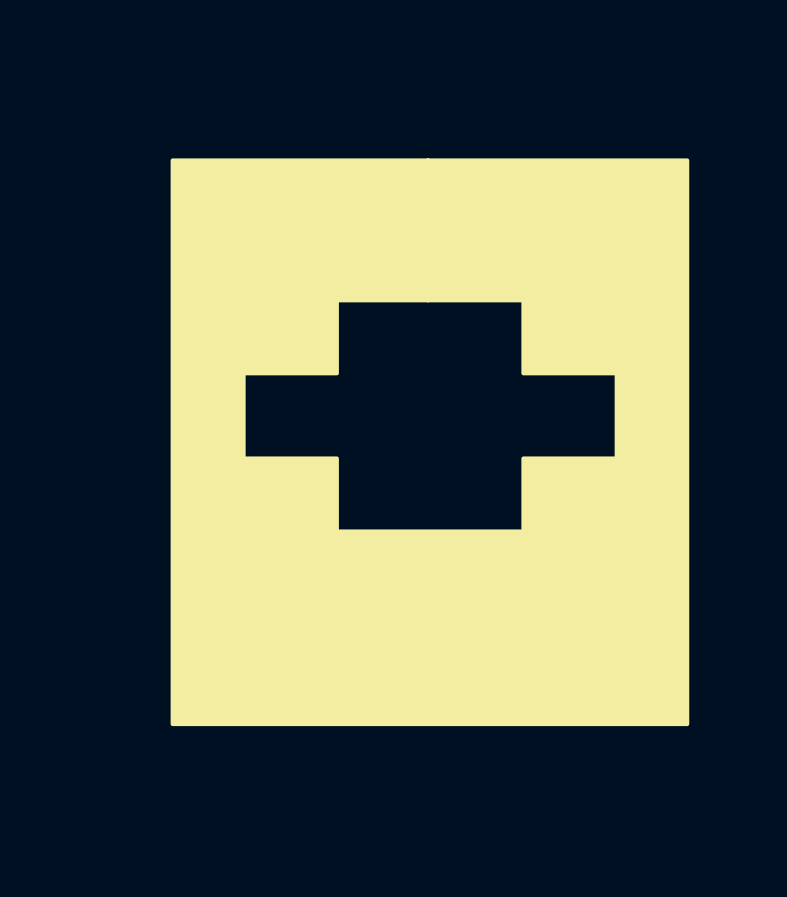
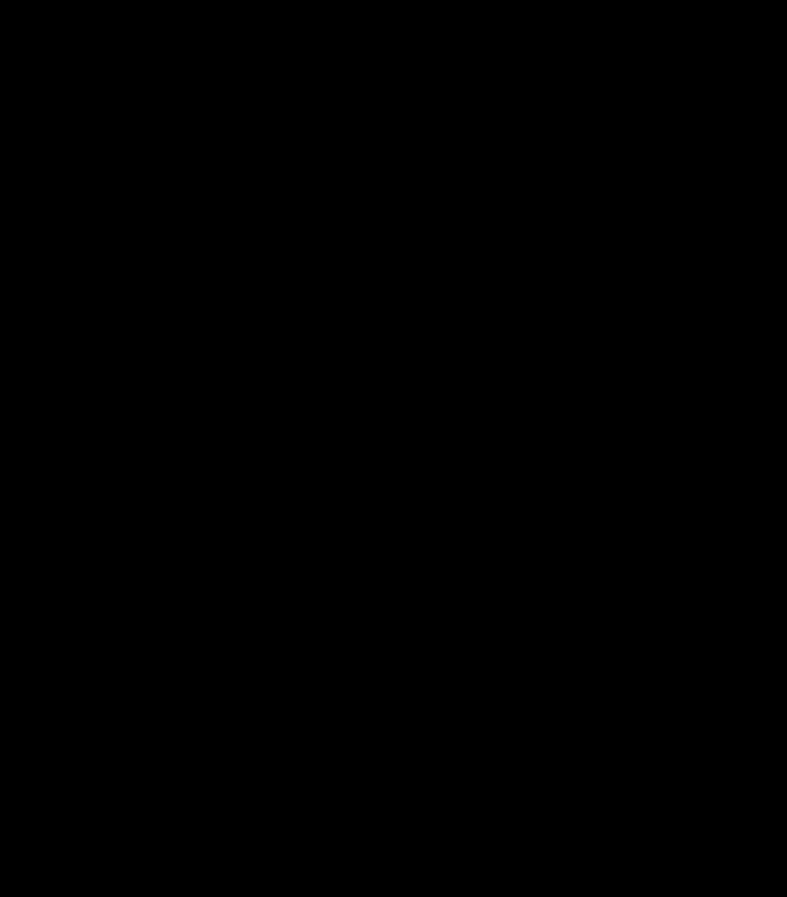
drawing: [170, 158, 690, 727] -> none

